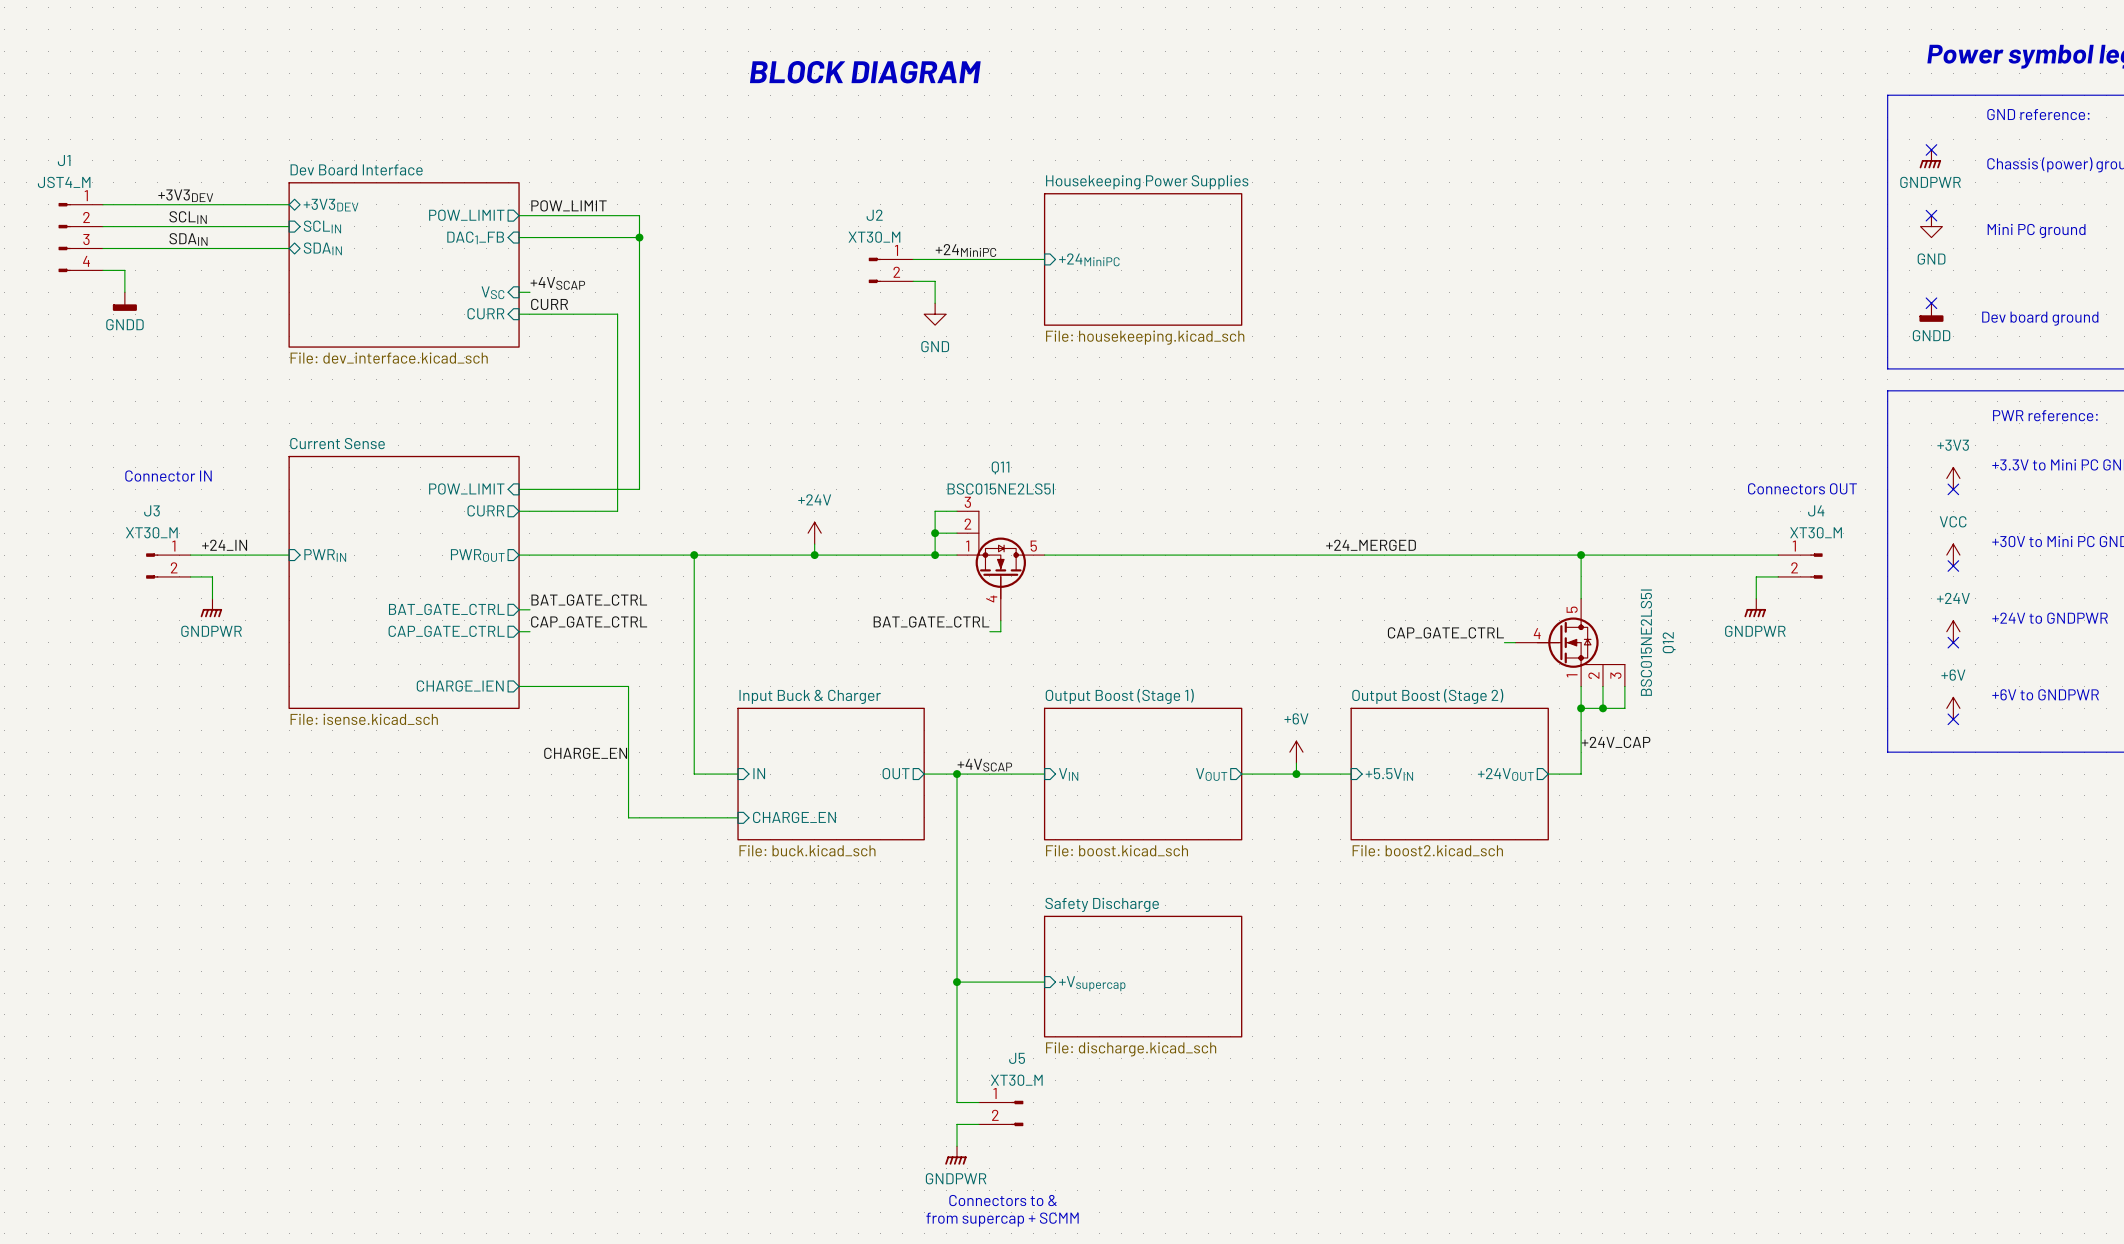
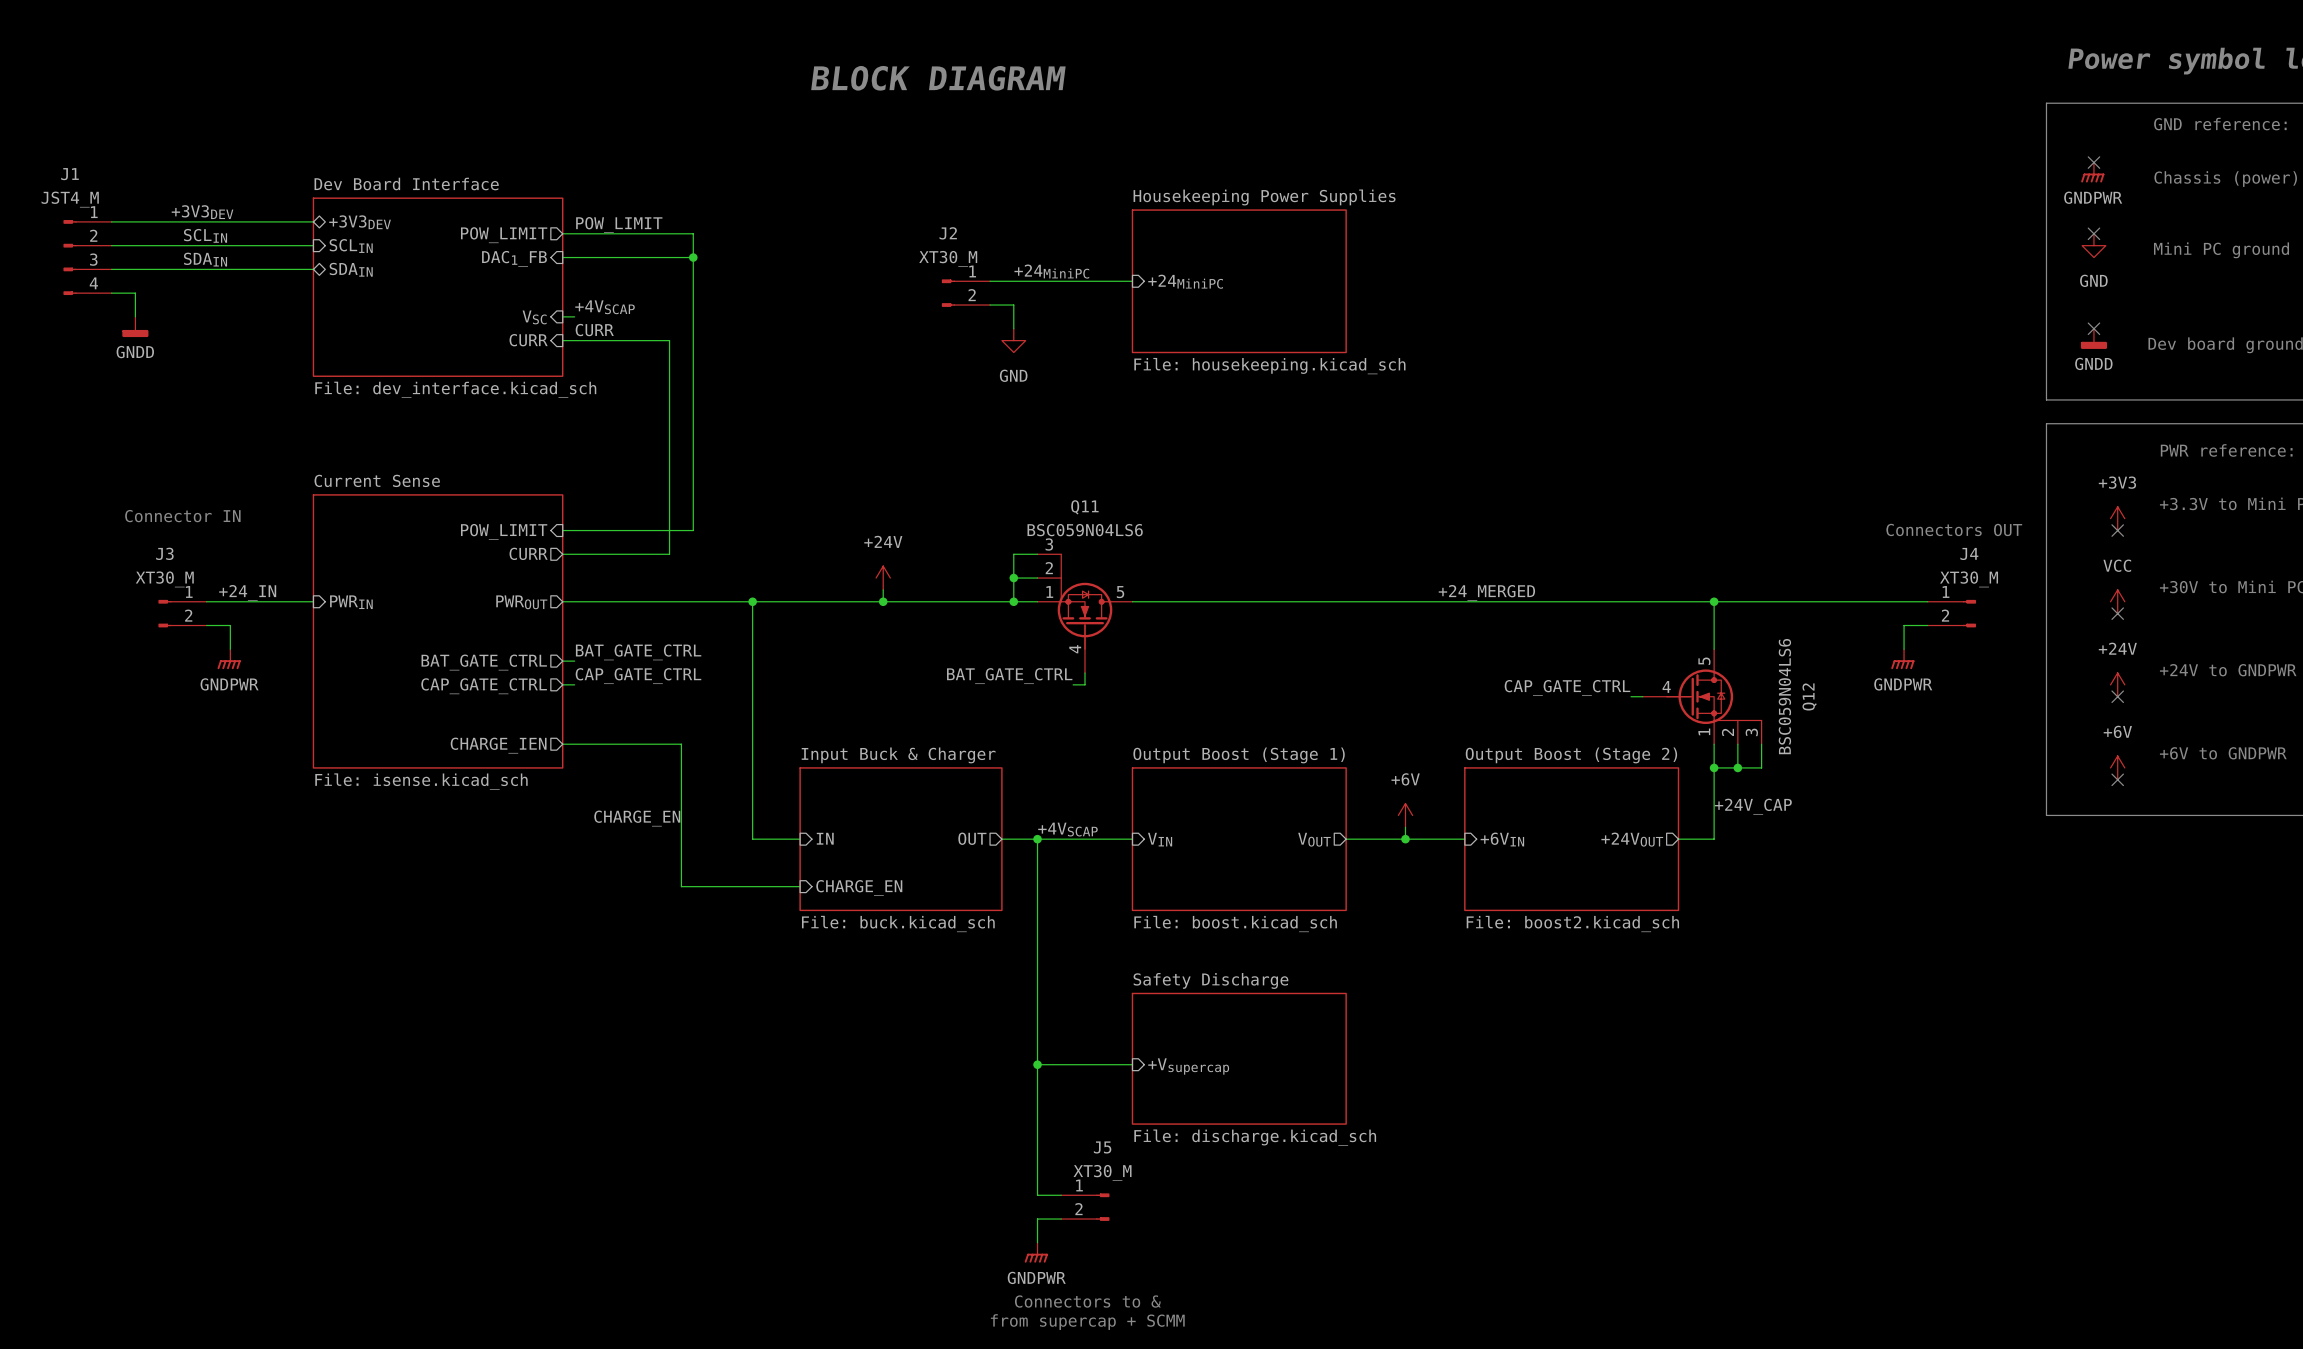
Q11 value: BSC015NE2LS5I (1000, 488) -> BSC059N04LS6 (1085, 530)
Q12 value: BSC015NE2LS5I (1646, 642) -> BSC059N04LS6 (1784, 696)
sheet pin: +5.5VIN (1389, 774) -> +6VIN (1502, 839)

